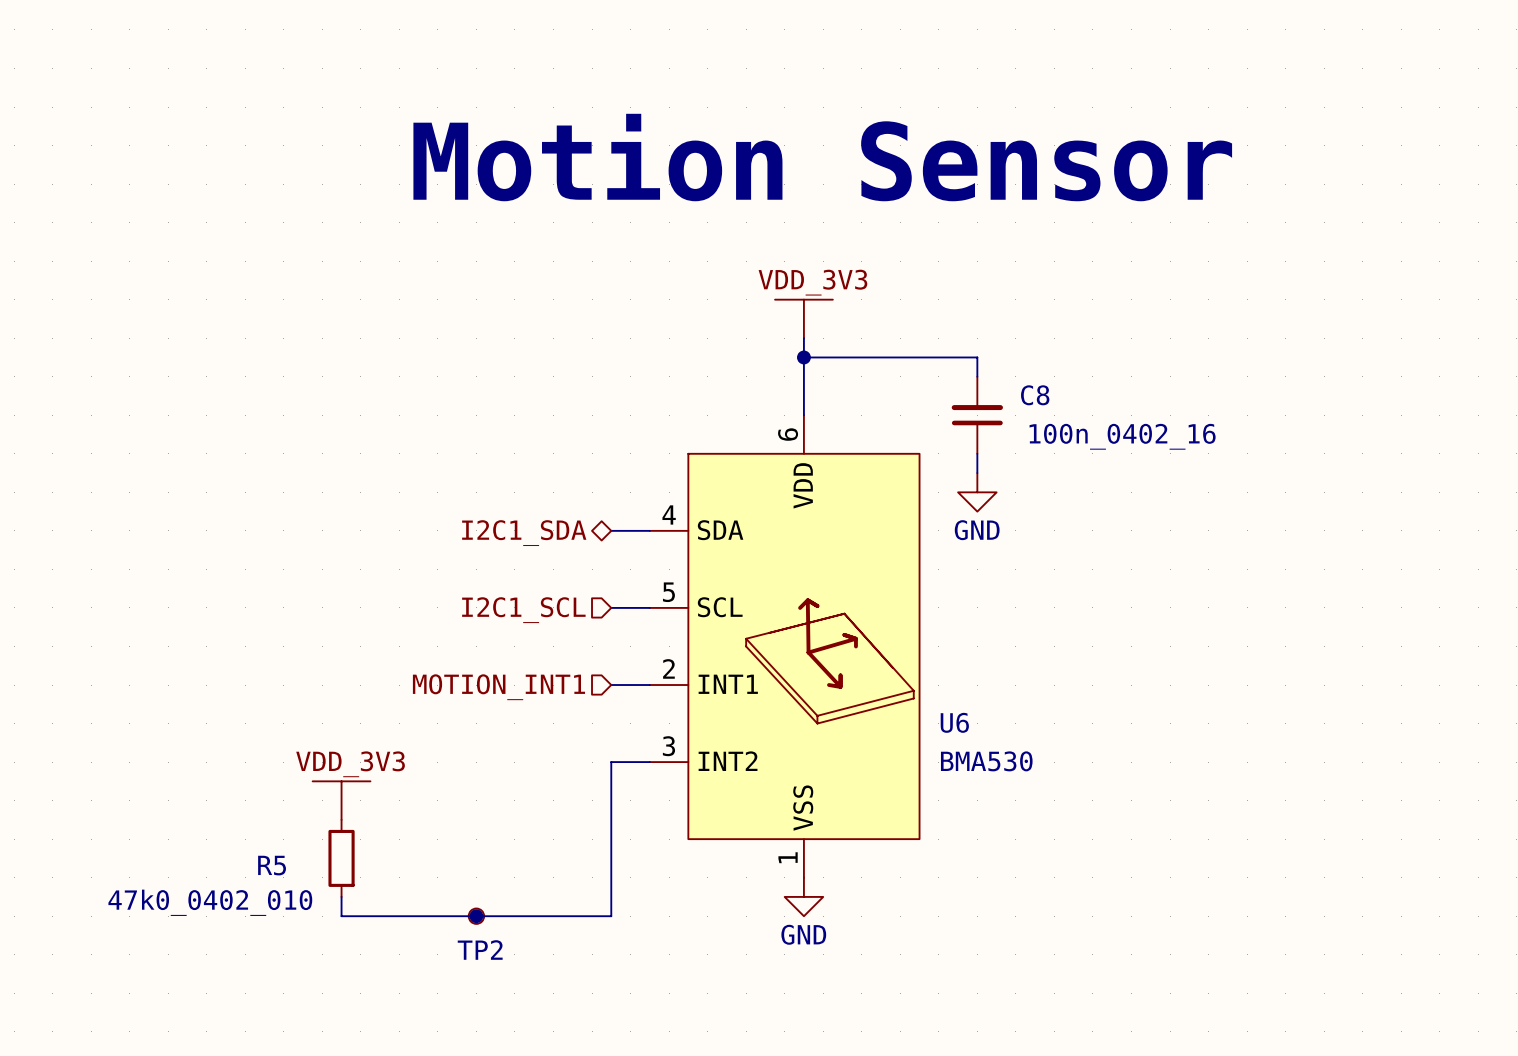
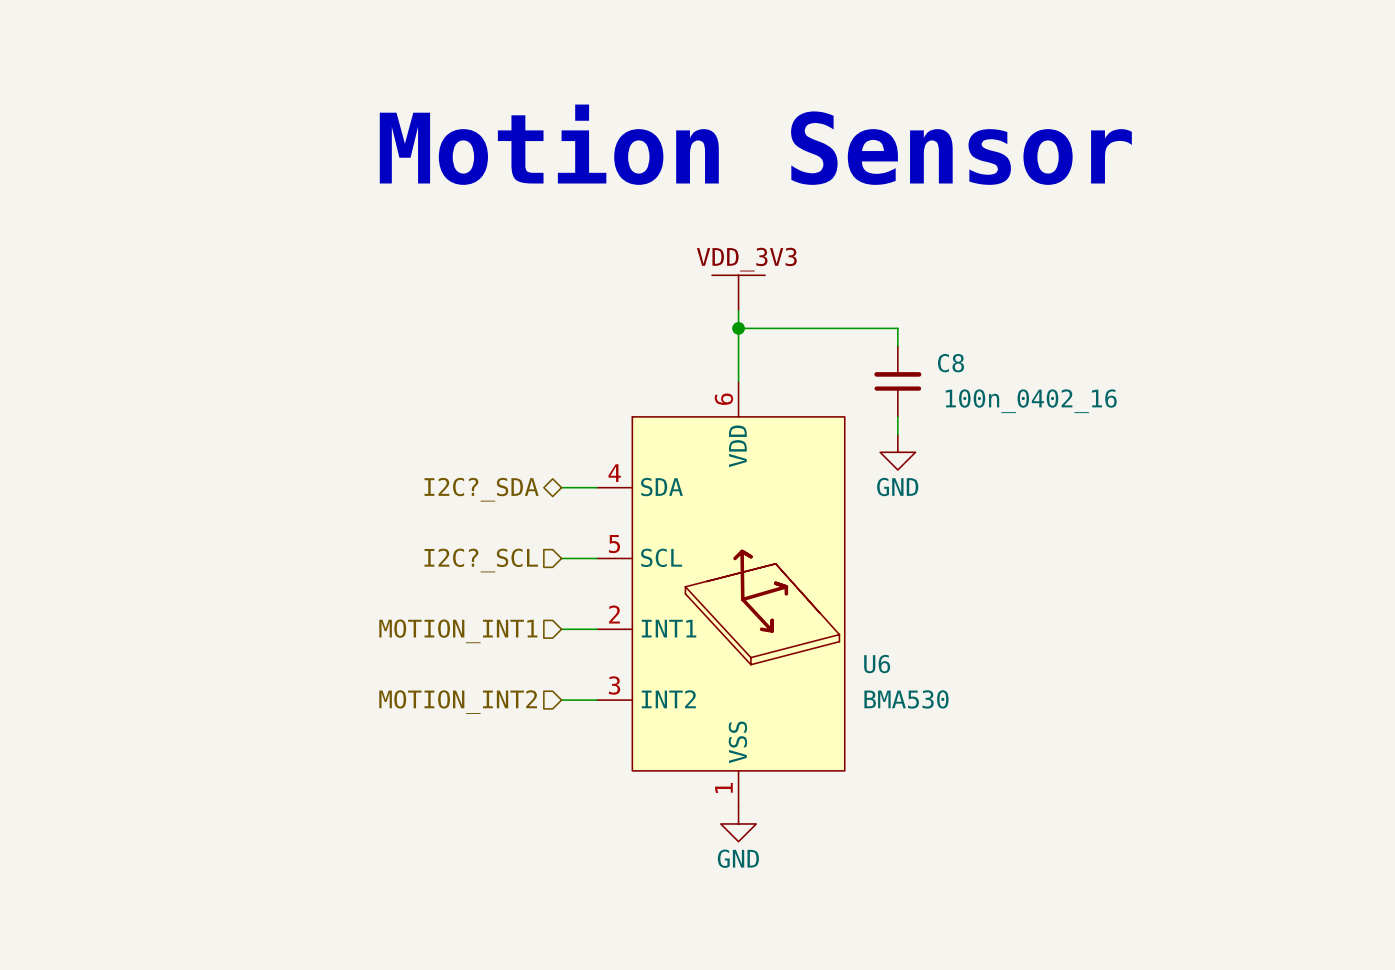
hierarchical label: I2C1_SDA (524, 533) -> I2C?_SDA (481, 489)
hierarchical label: I2C1_SCL (523, 610) -> I2C?_SCL (481, 560)
wire: (611, 762) (611, 916) (341, 916) (341, 896) -> none
hierarchical label: none -> MOTION_INT2 (458, 702)
power symbol: (341, 800) -> none
R5: 47k0_0402_010 (341, 858) -> none
junction: (476, 916) -> none
TP2: (476, 916) -> none

